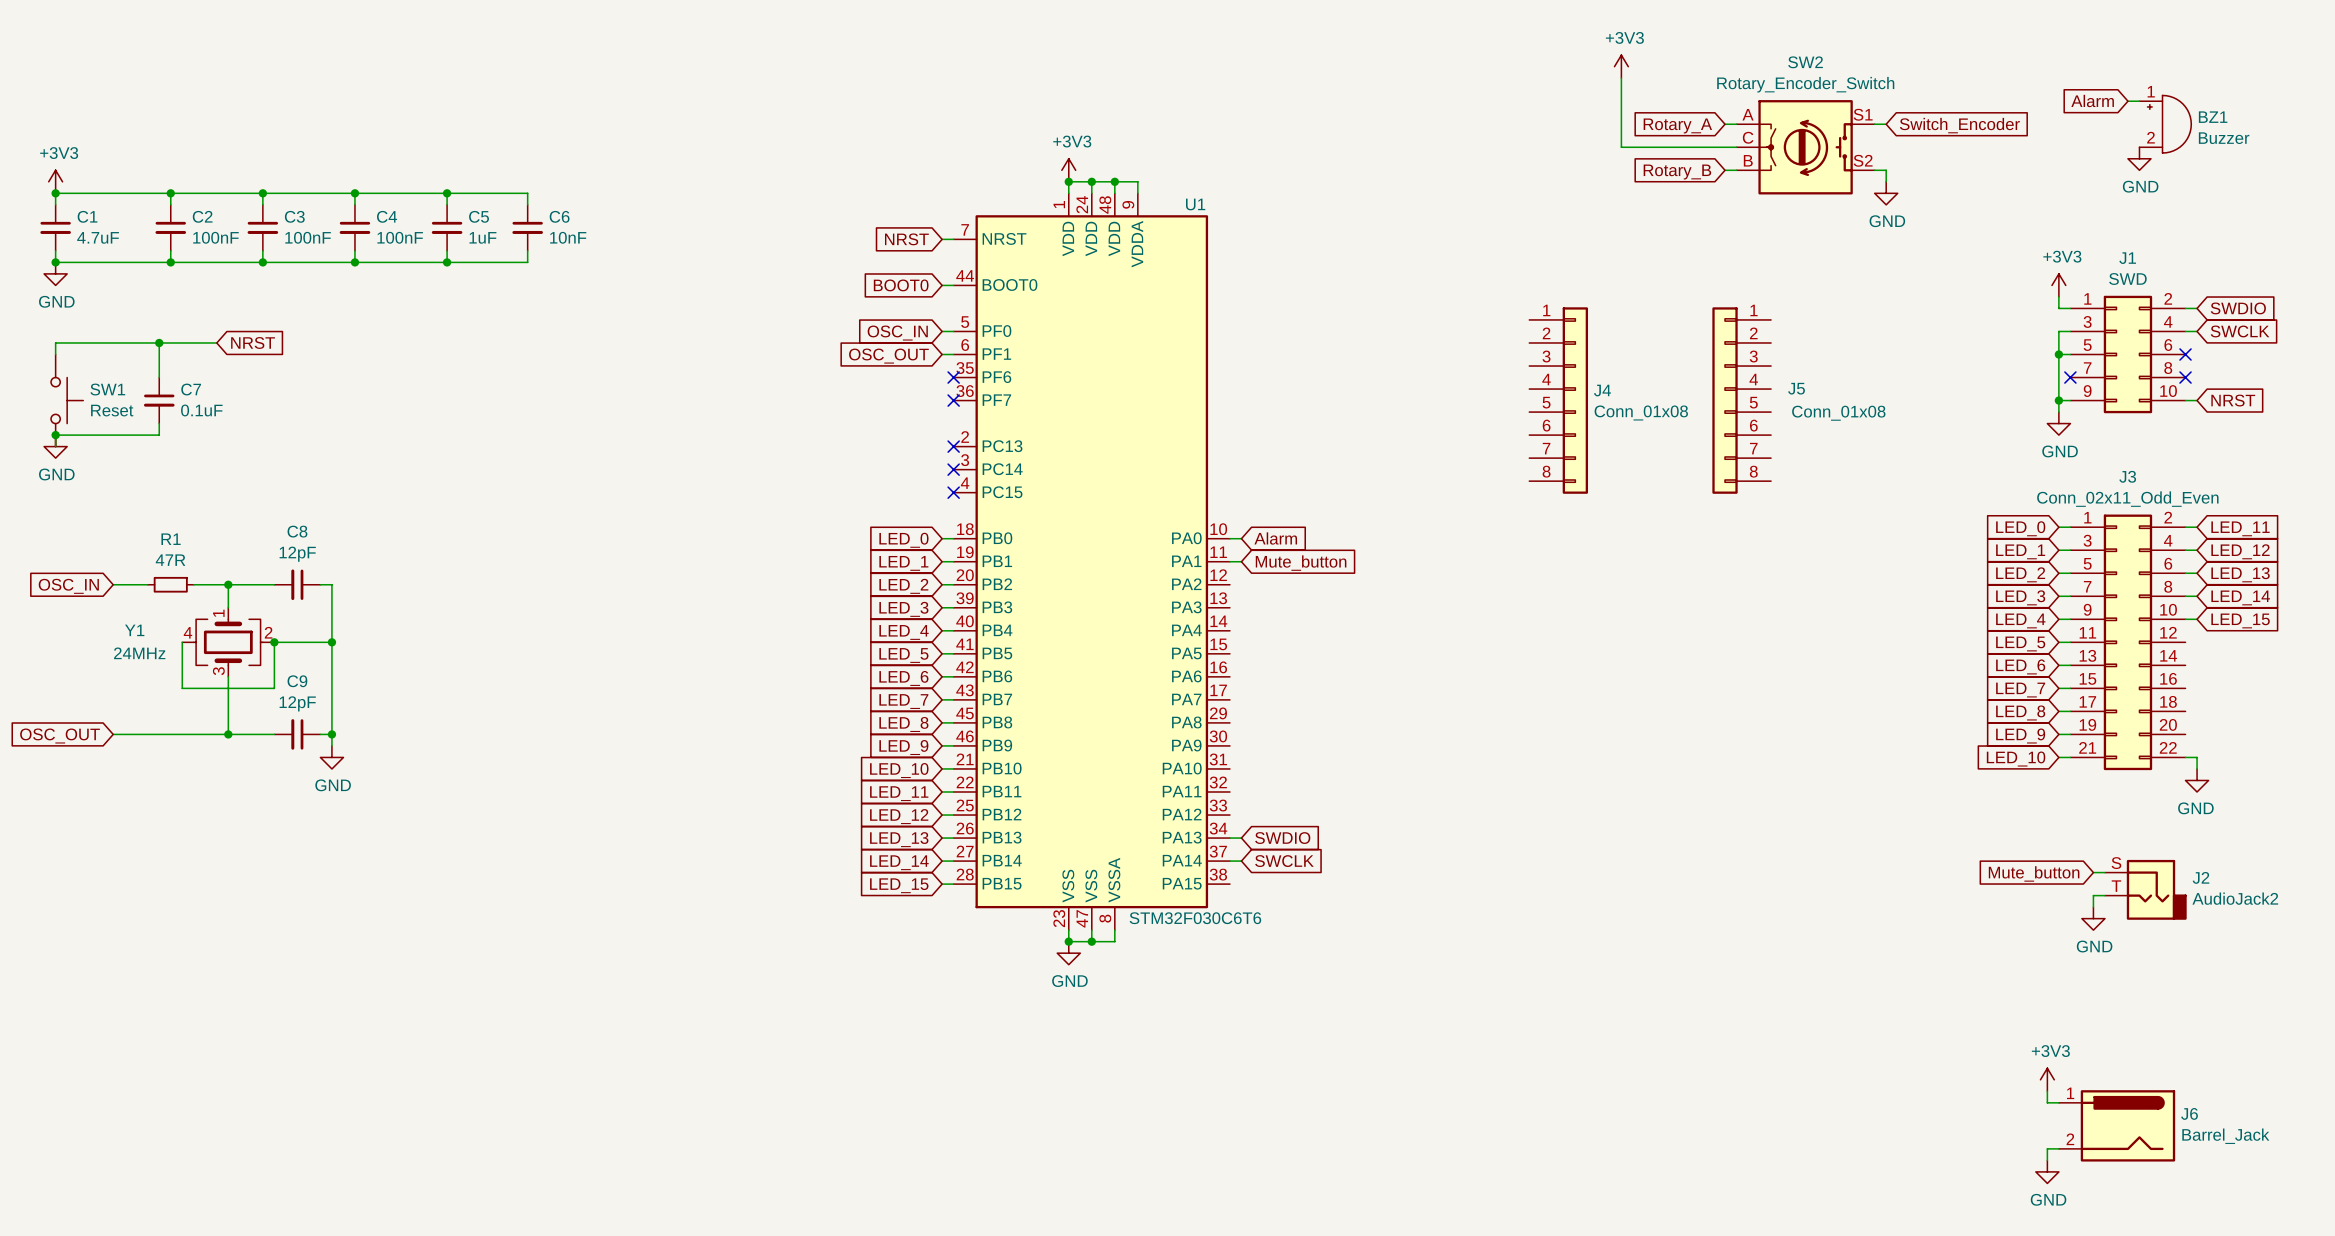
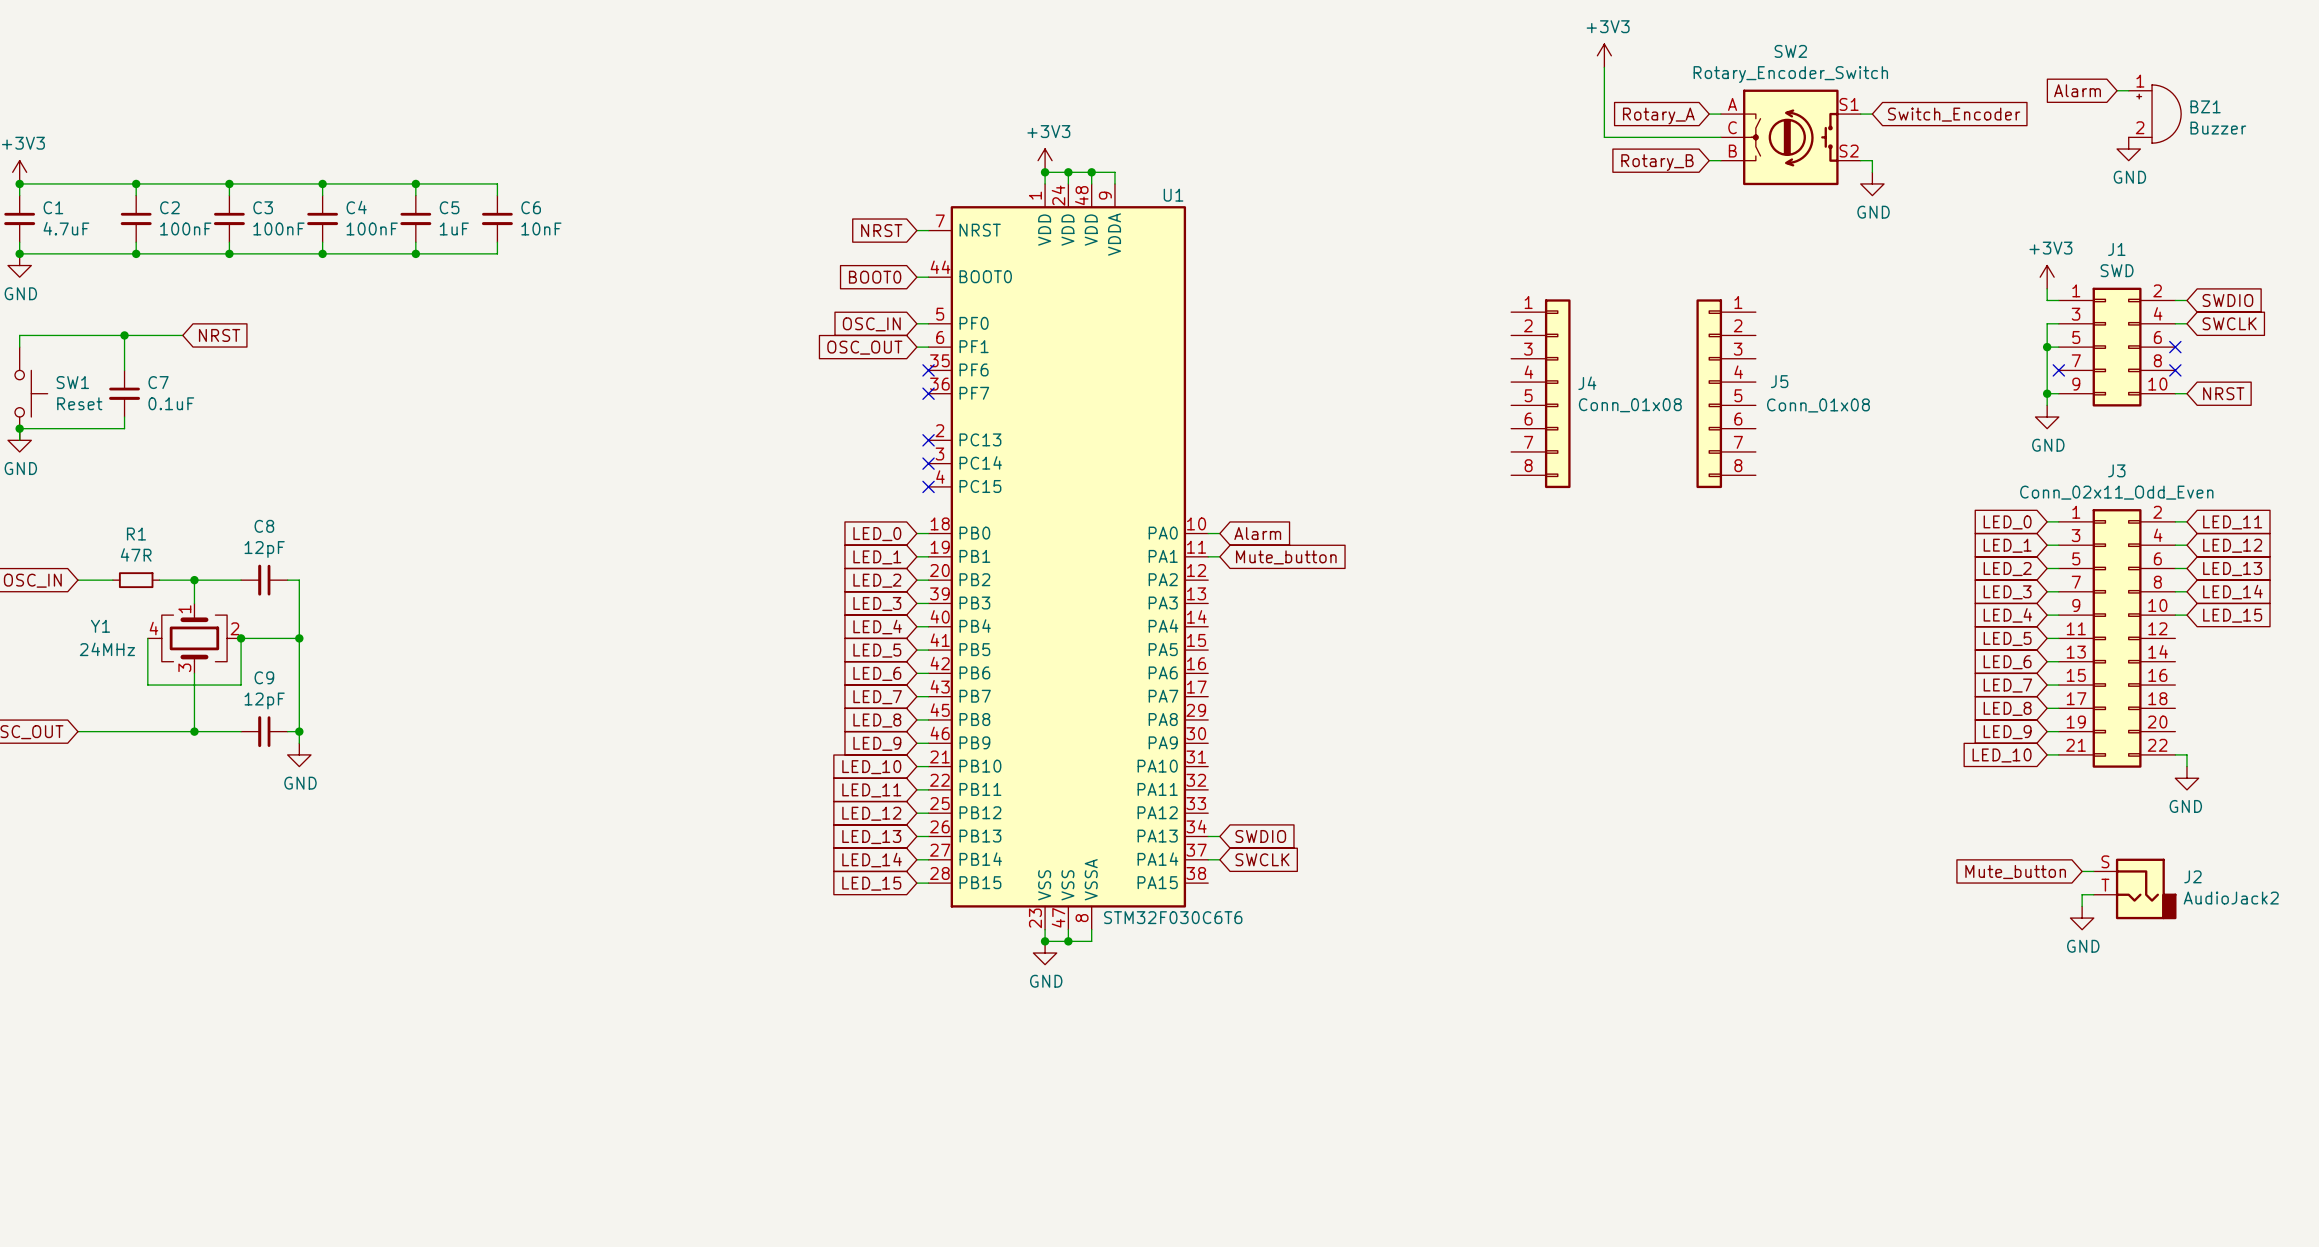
power symbol: +3V3 (2047, 1079) -> none
wire: (2047, 1091) (2047, 1102) (2058, 1102) -> none
J6: Barrel_Jack (2117, 1125) -> none
wire: (2058, 1148) (2047, 1148) (2047, 1160) -> none
power symbol: GND (2047, 1171) -> none

